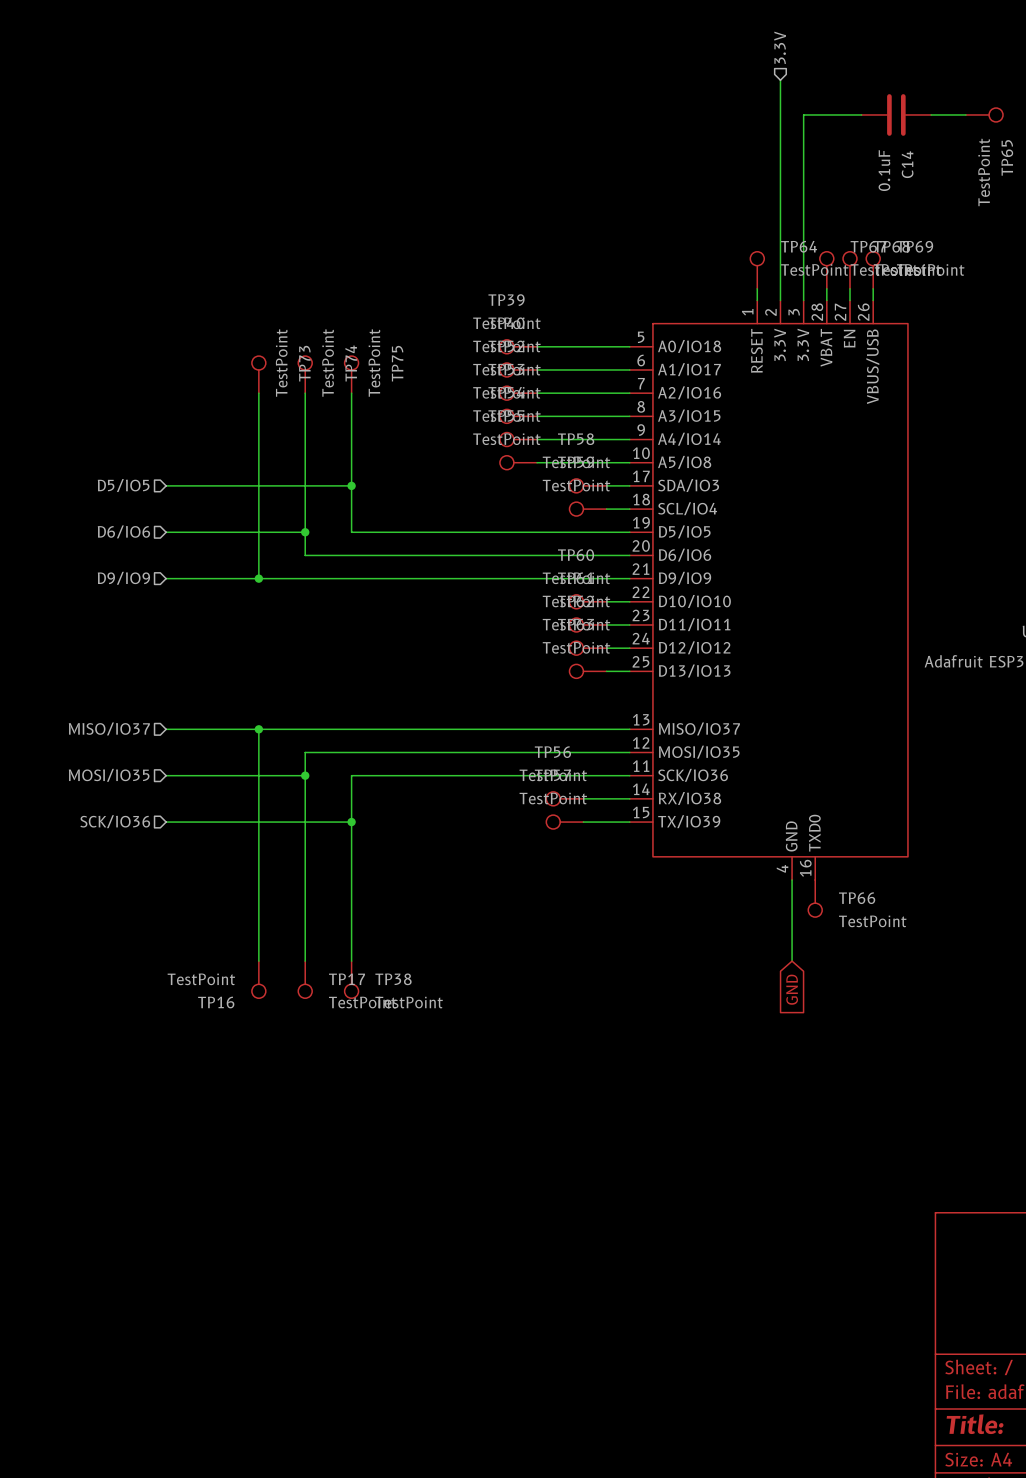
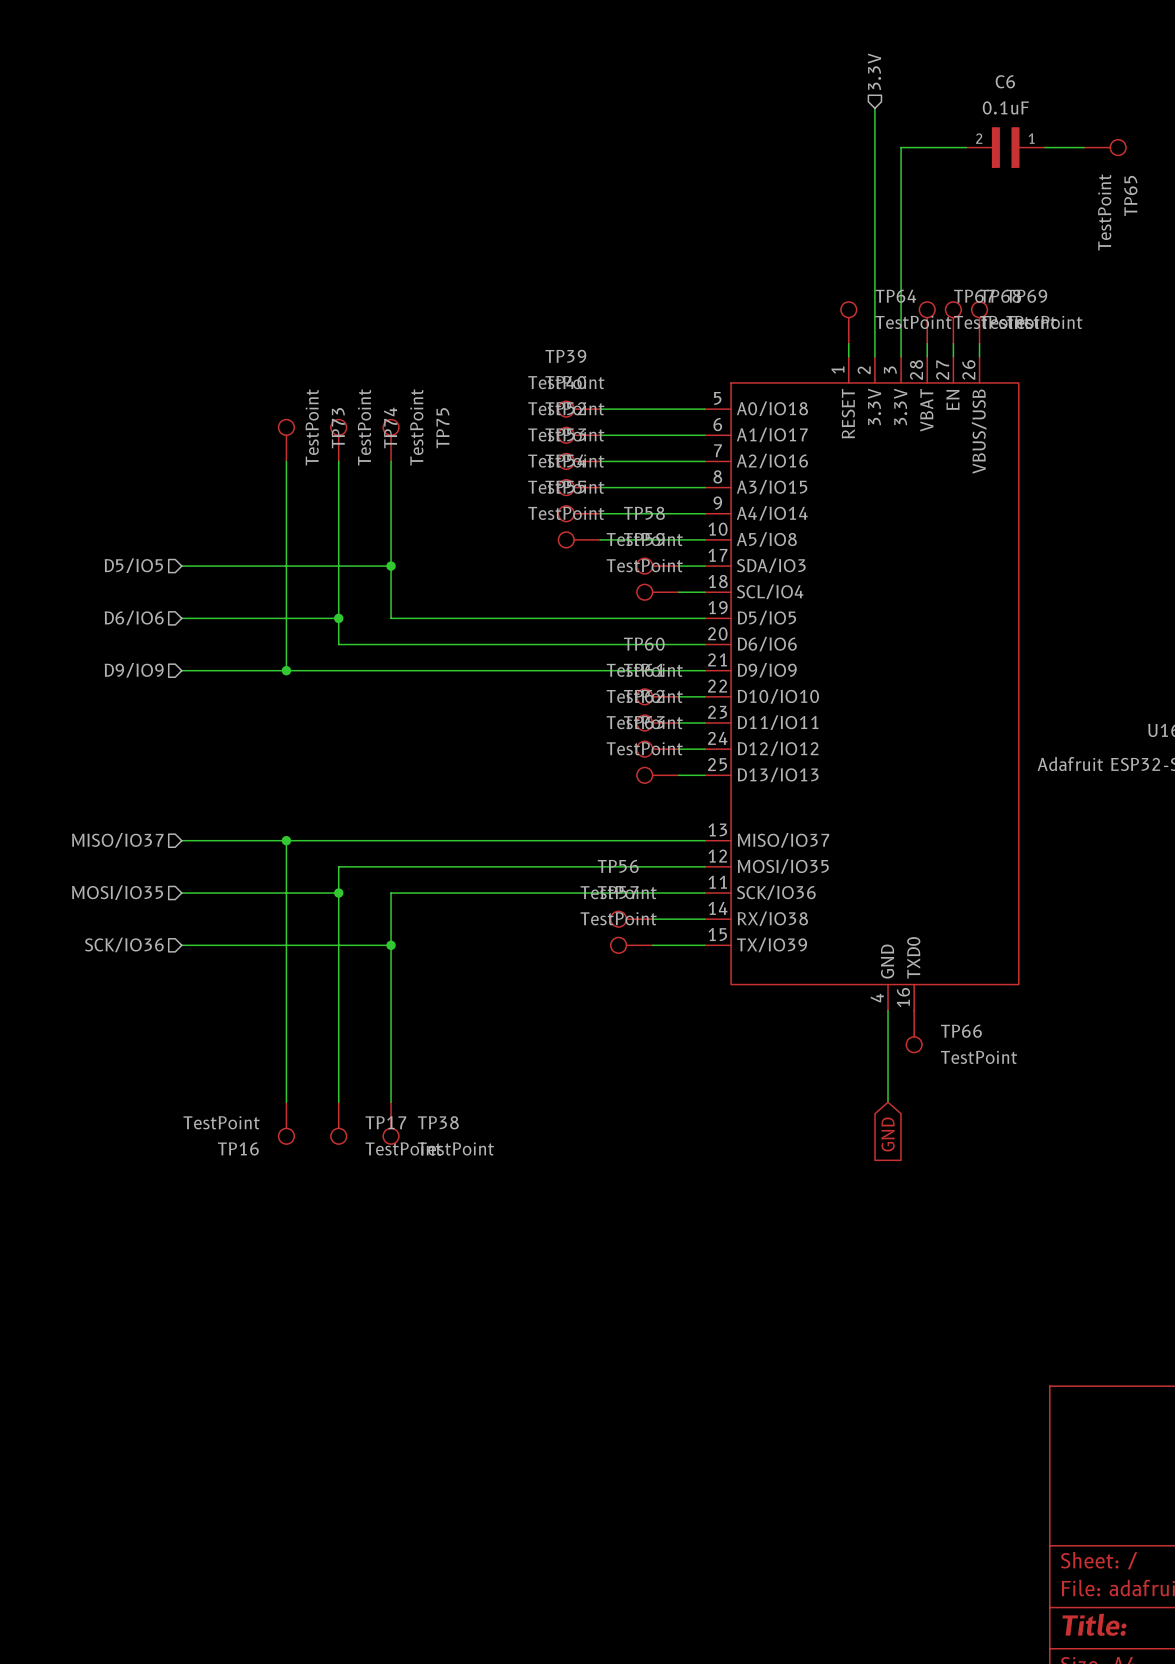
C14: 0.1uF (896, 114) -> none
C6: none -> 0.1uF (1005, 147)

